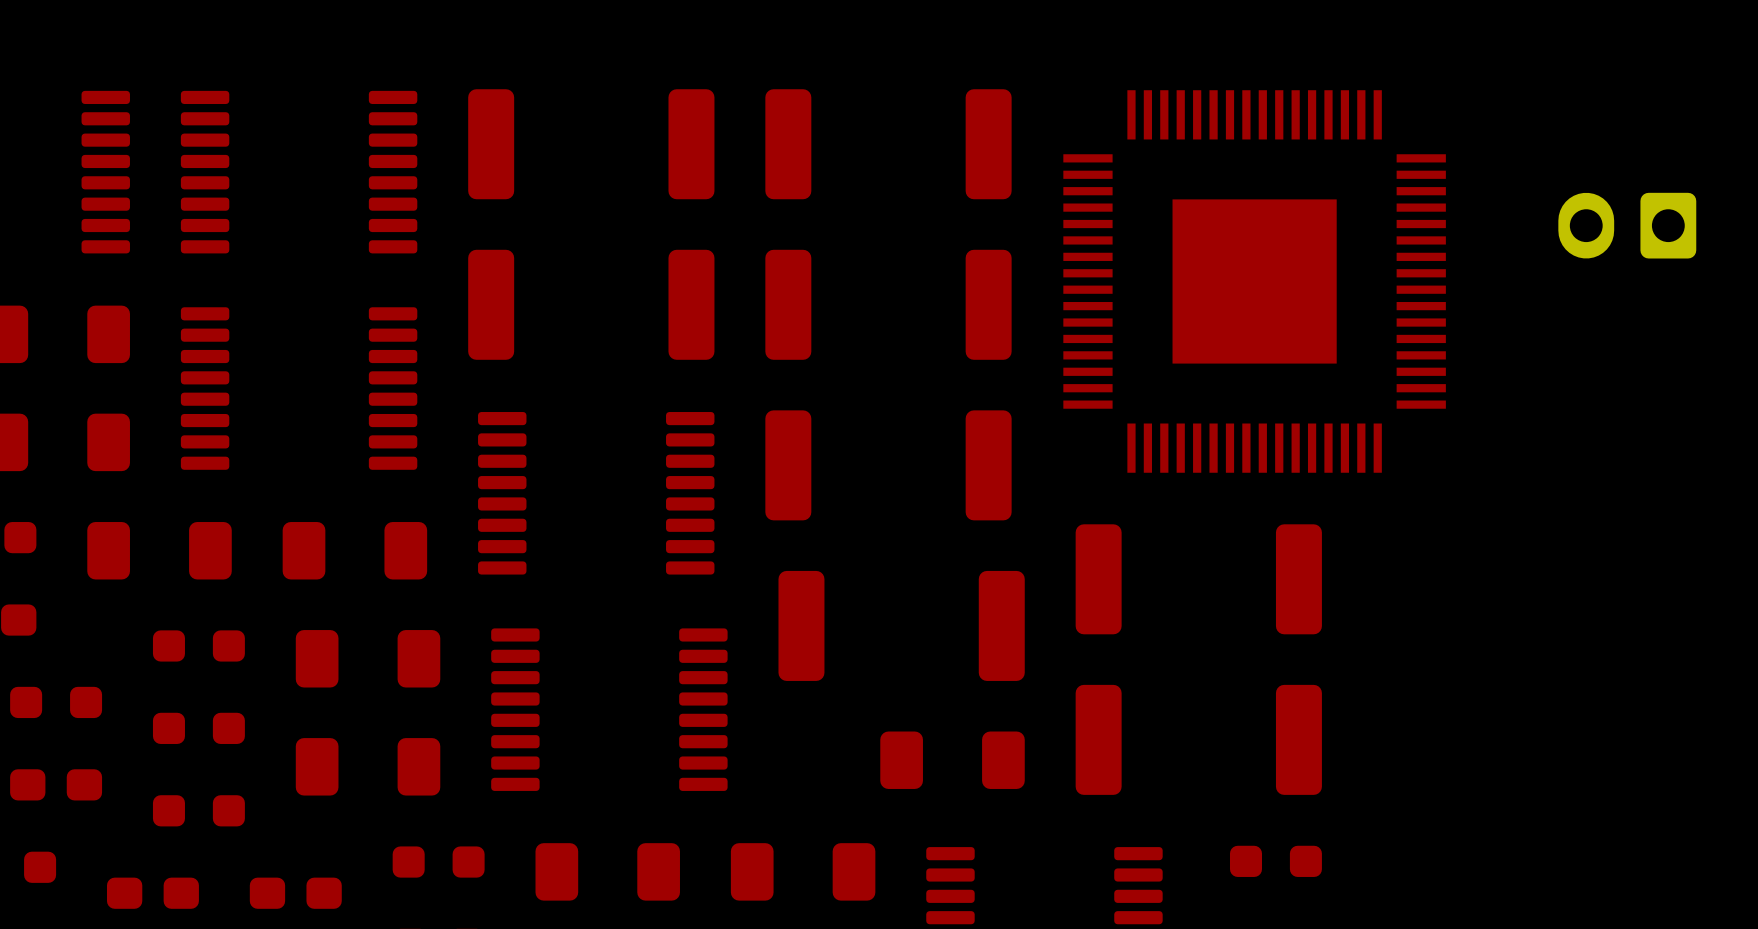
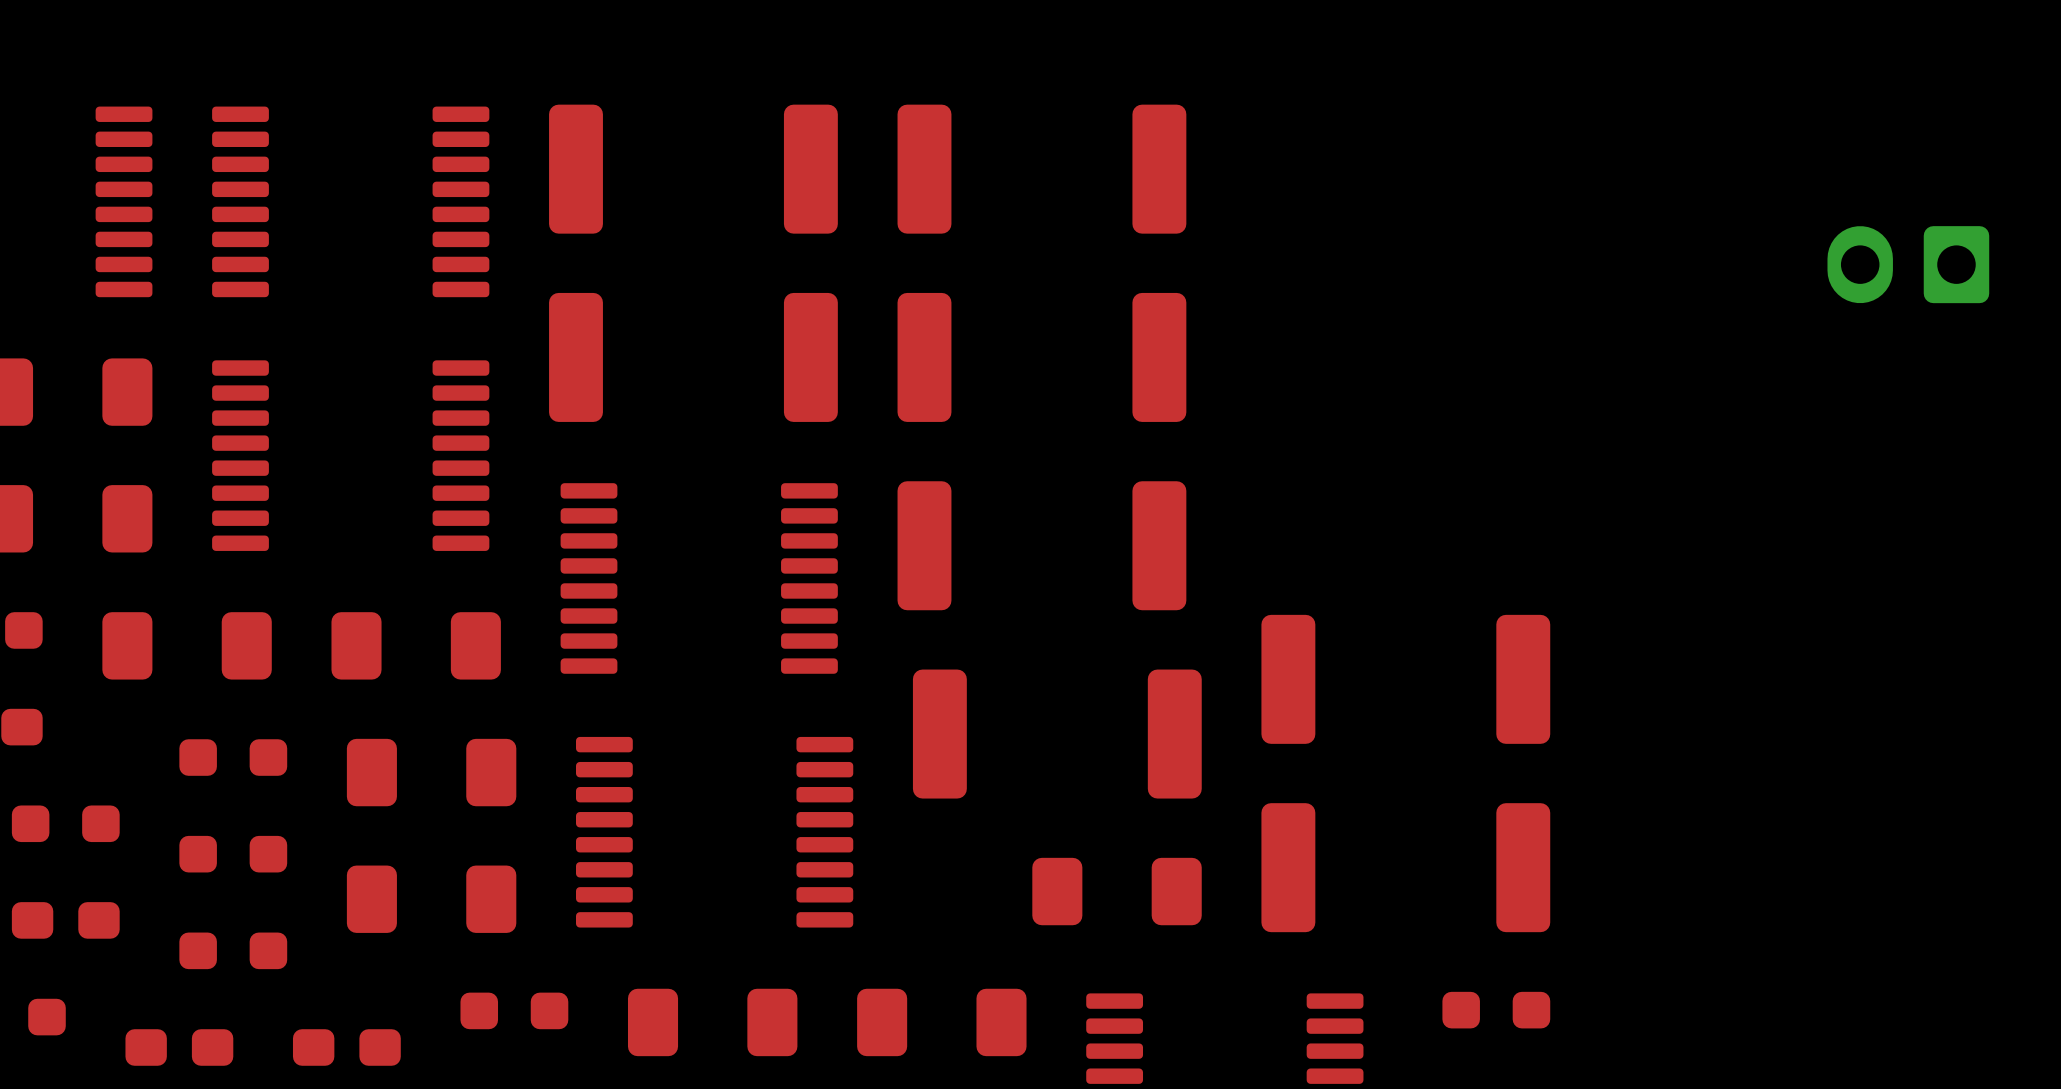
part: (1254, 281) -> none

